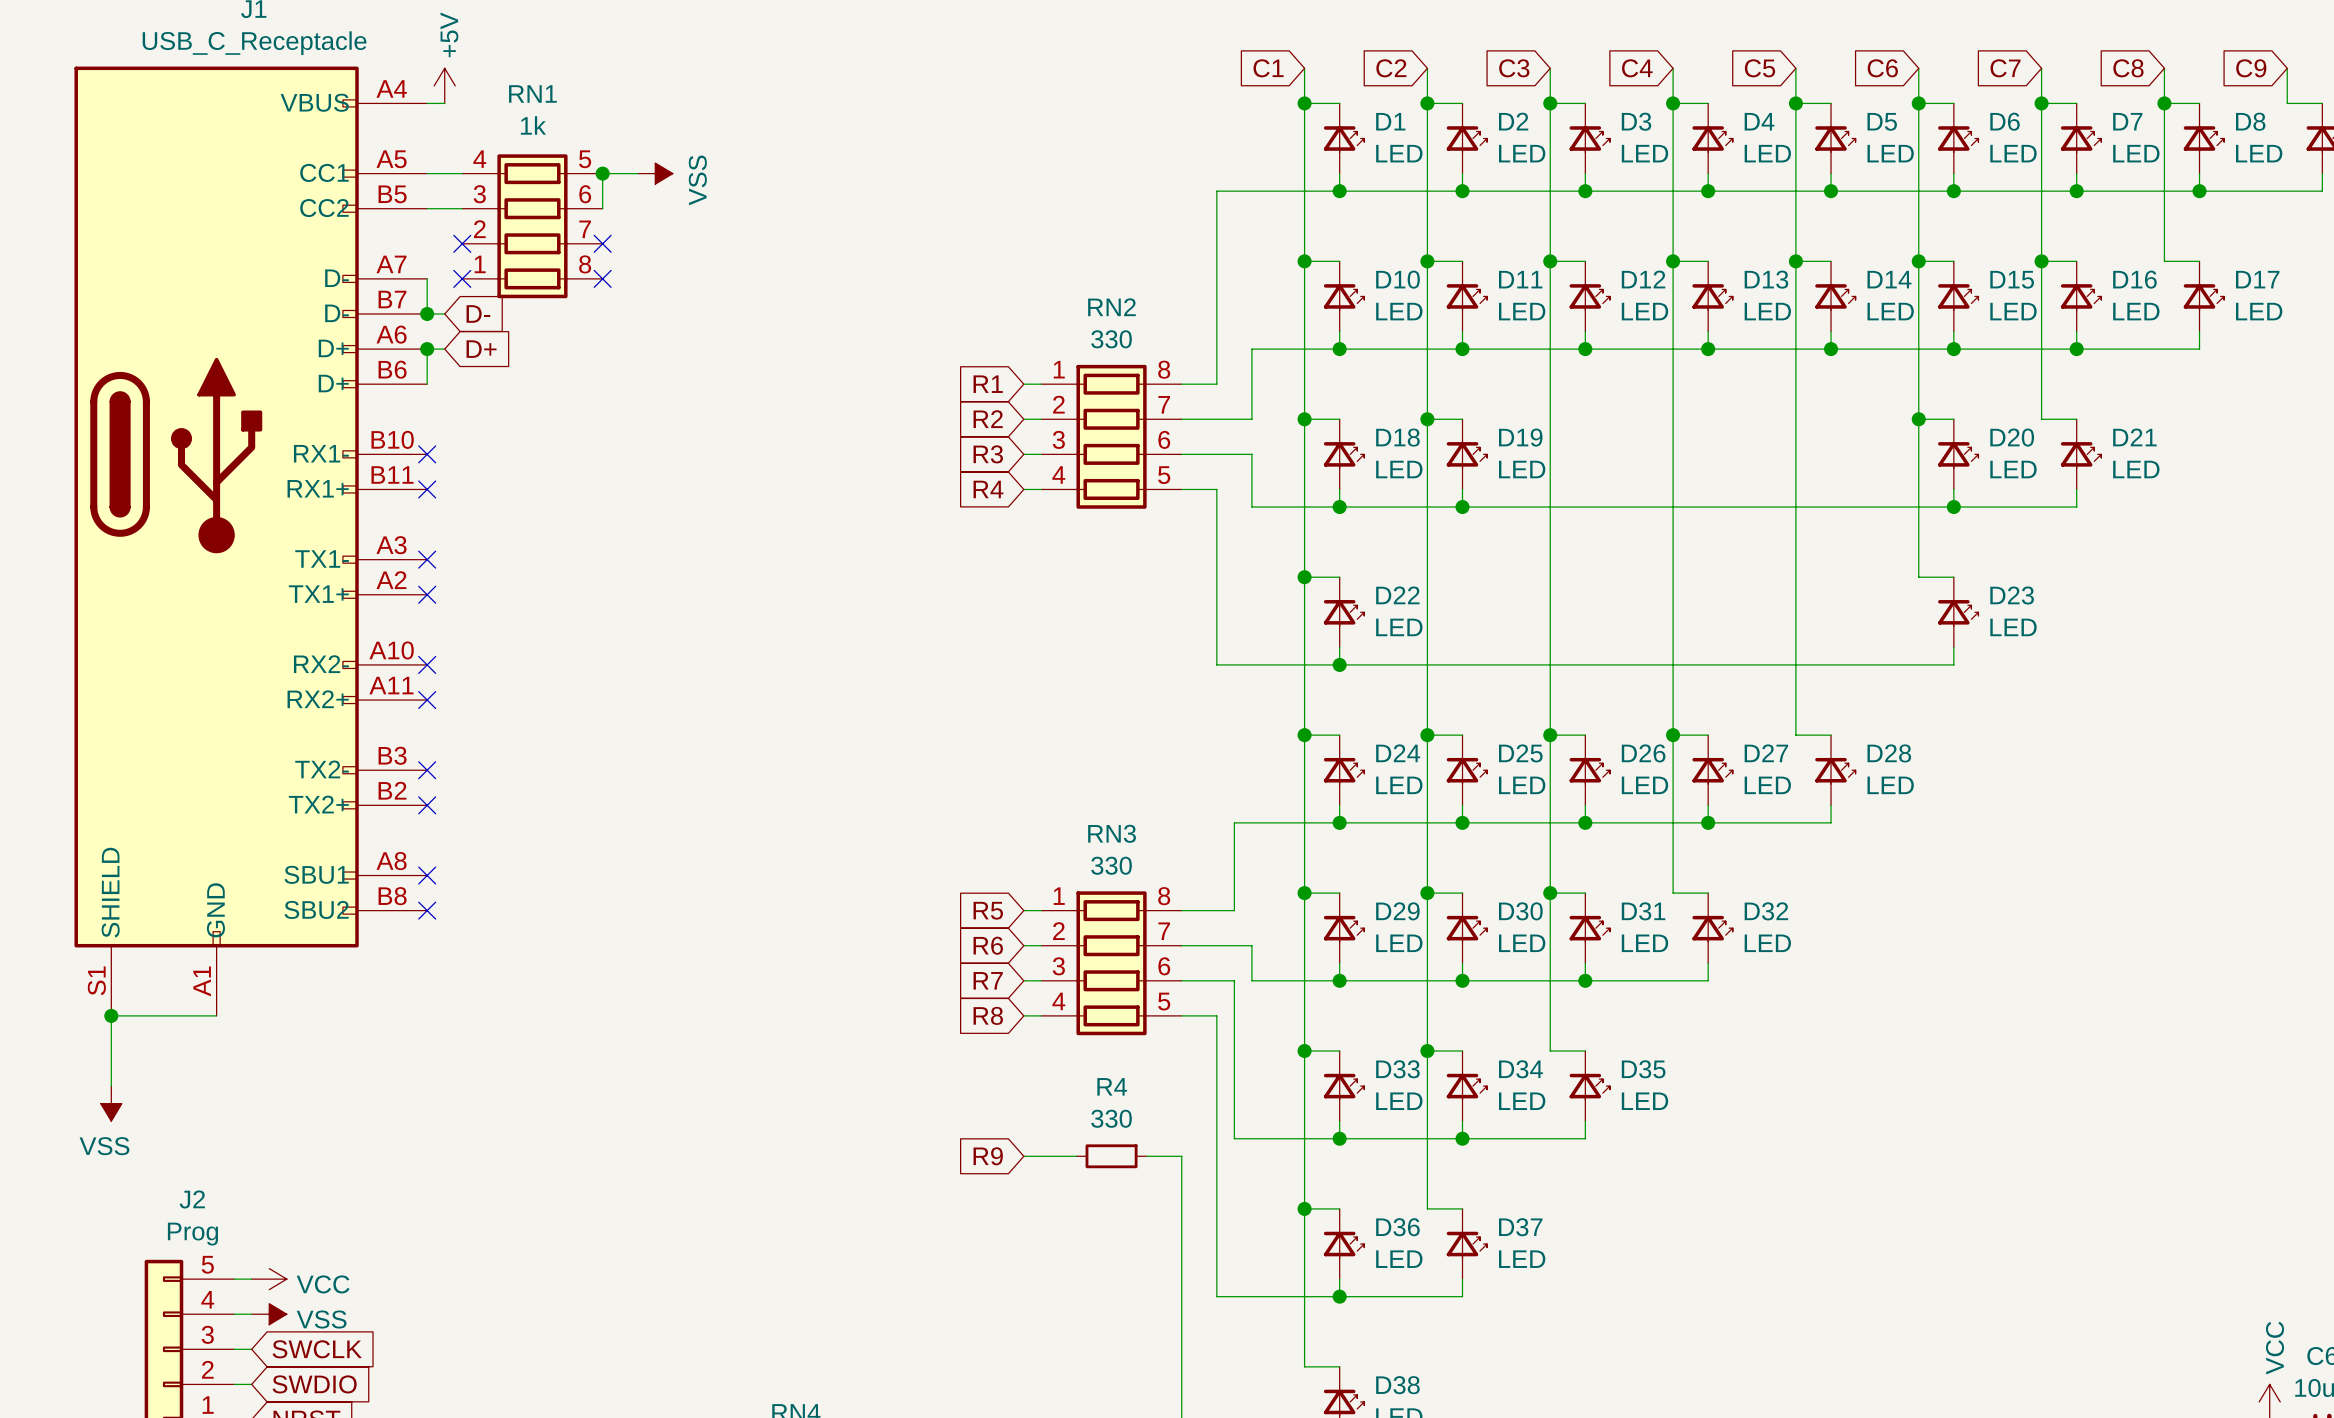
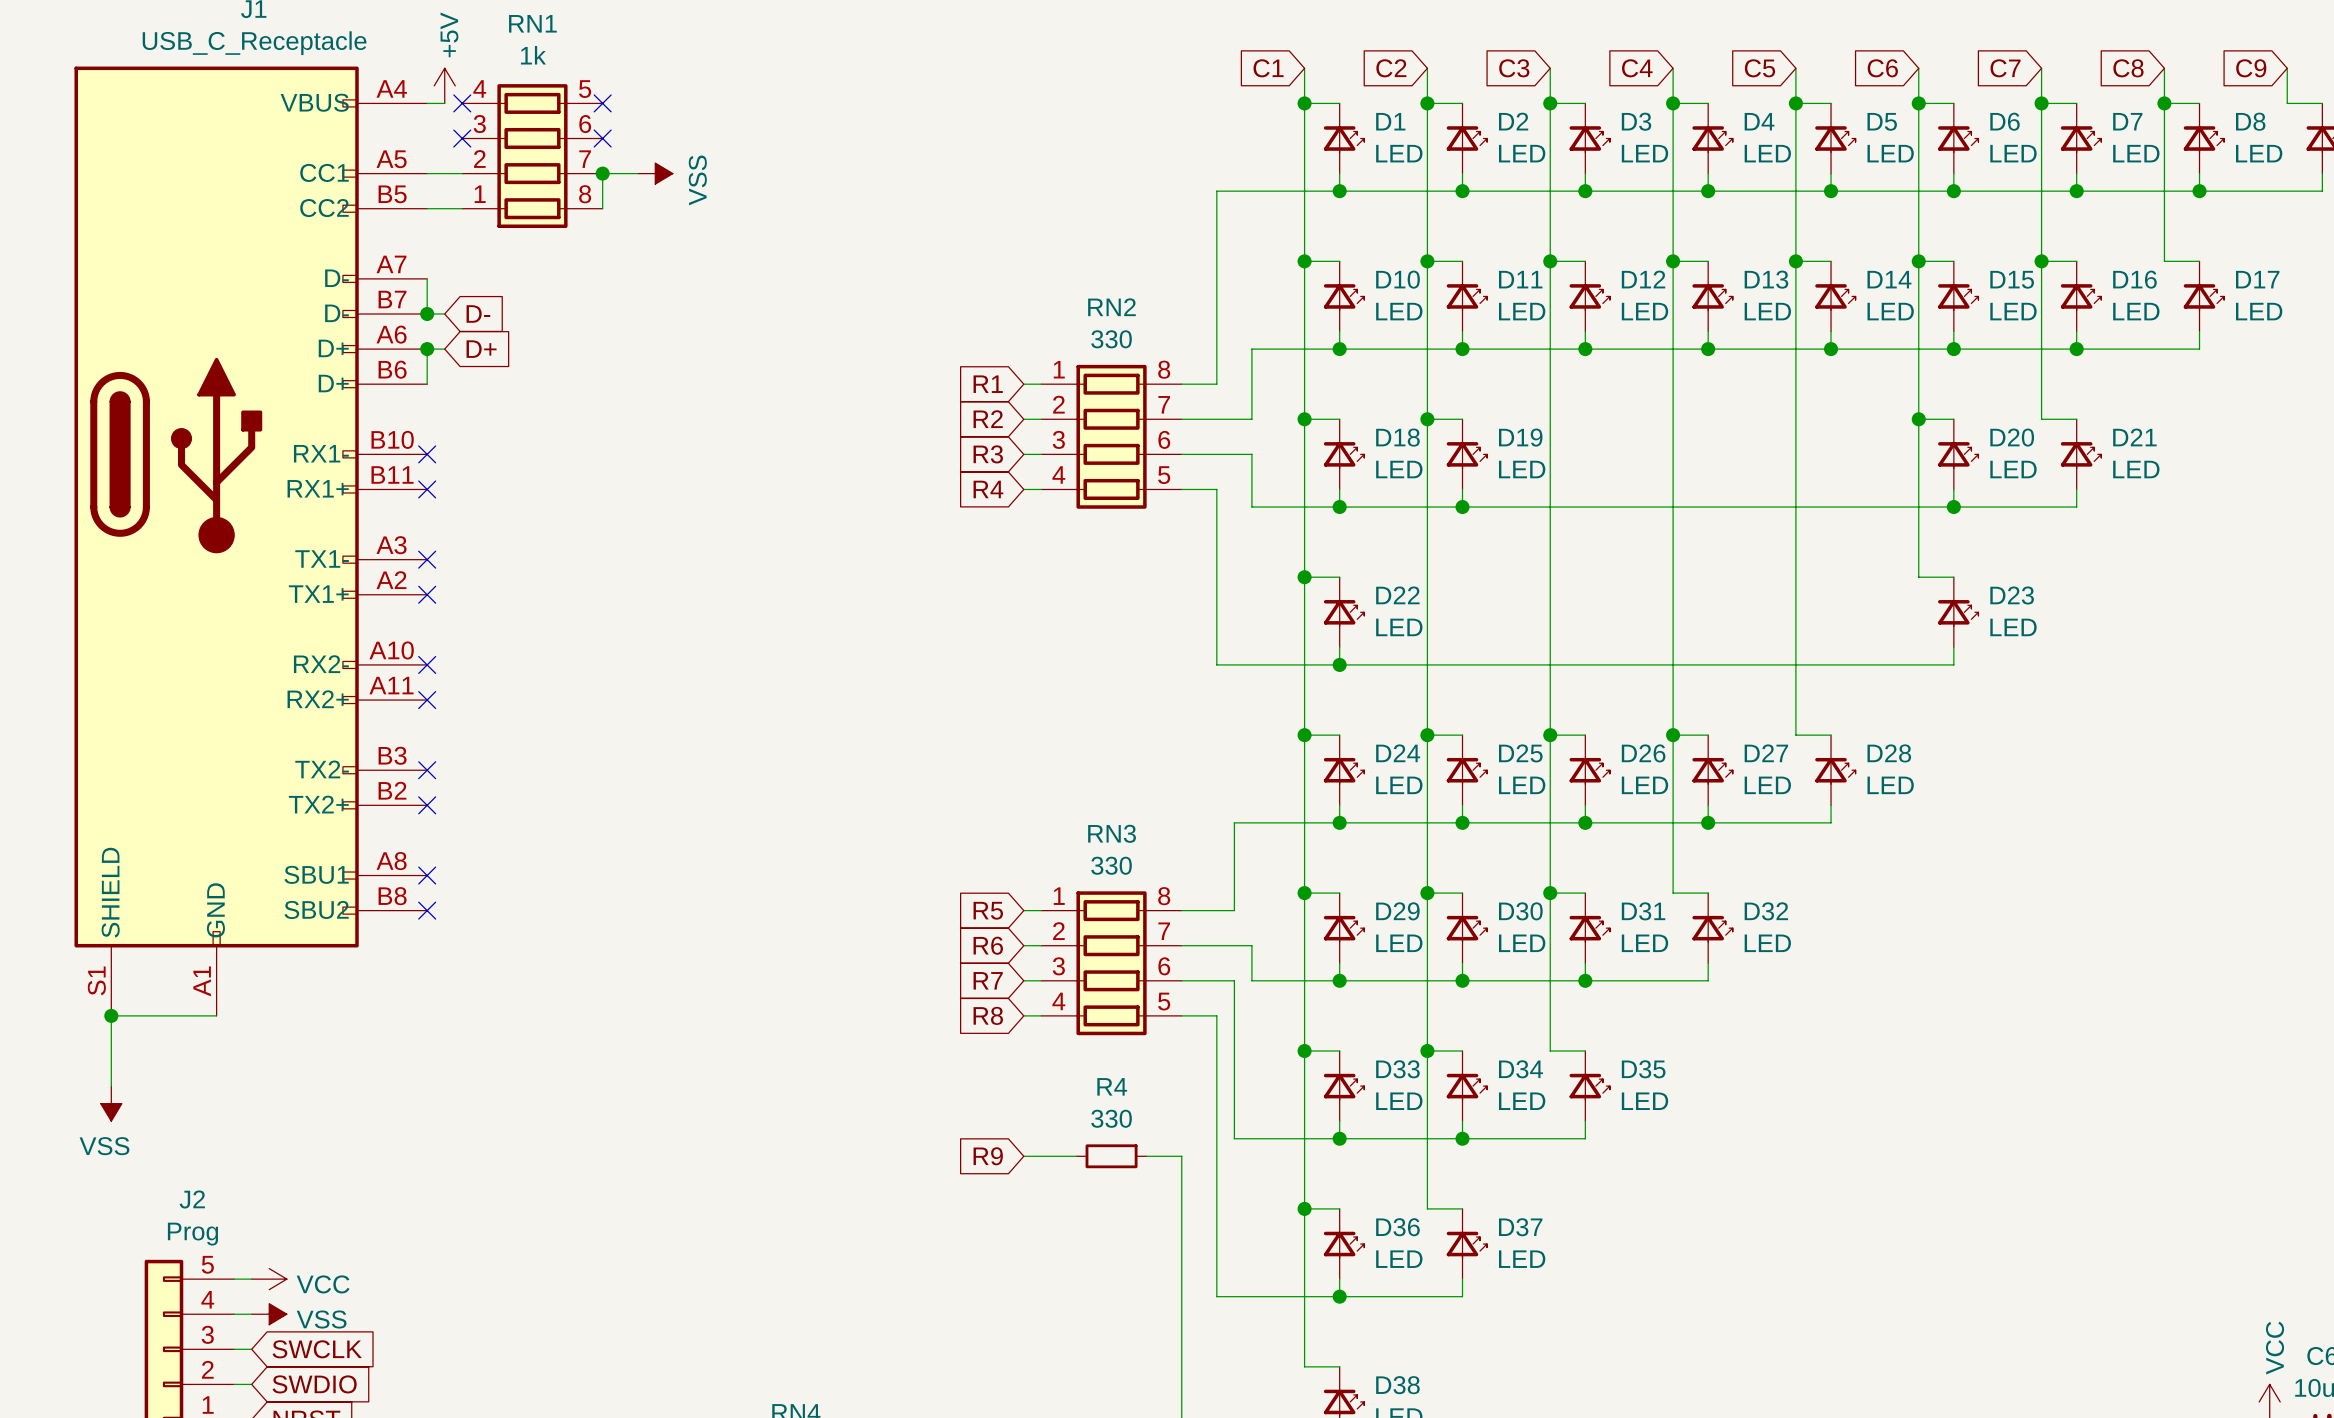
no-connect mark: none -> (462, 103)
no-connect mark: none -> (602, 103)
no-connect mark: none -> (462, 138)
no-connect mark: none -> (602, 138)
RN1 position: (532, 226) -> (532, 156)
no-connect mark: (462, 243) -> none
no-connect mark: (602, 243) -> none
no-connect mark: (462, 278) -> none
no-connect mark: (602, 278) -> none

